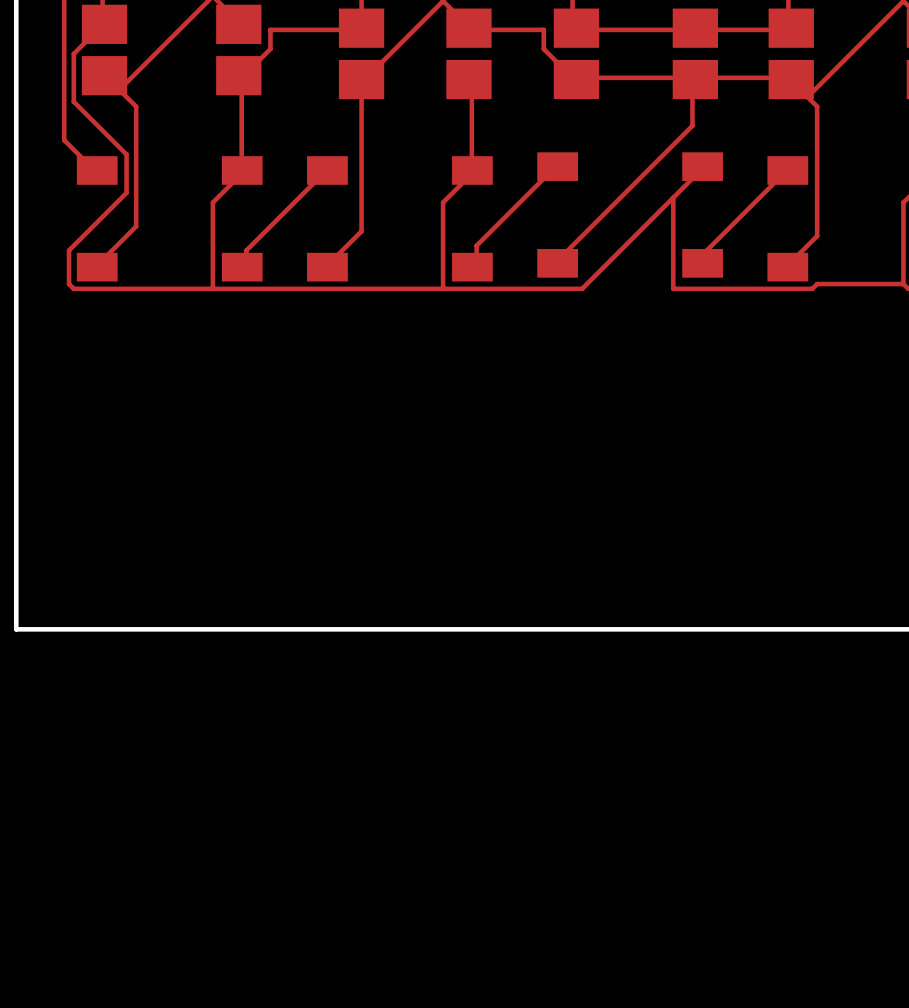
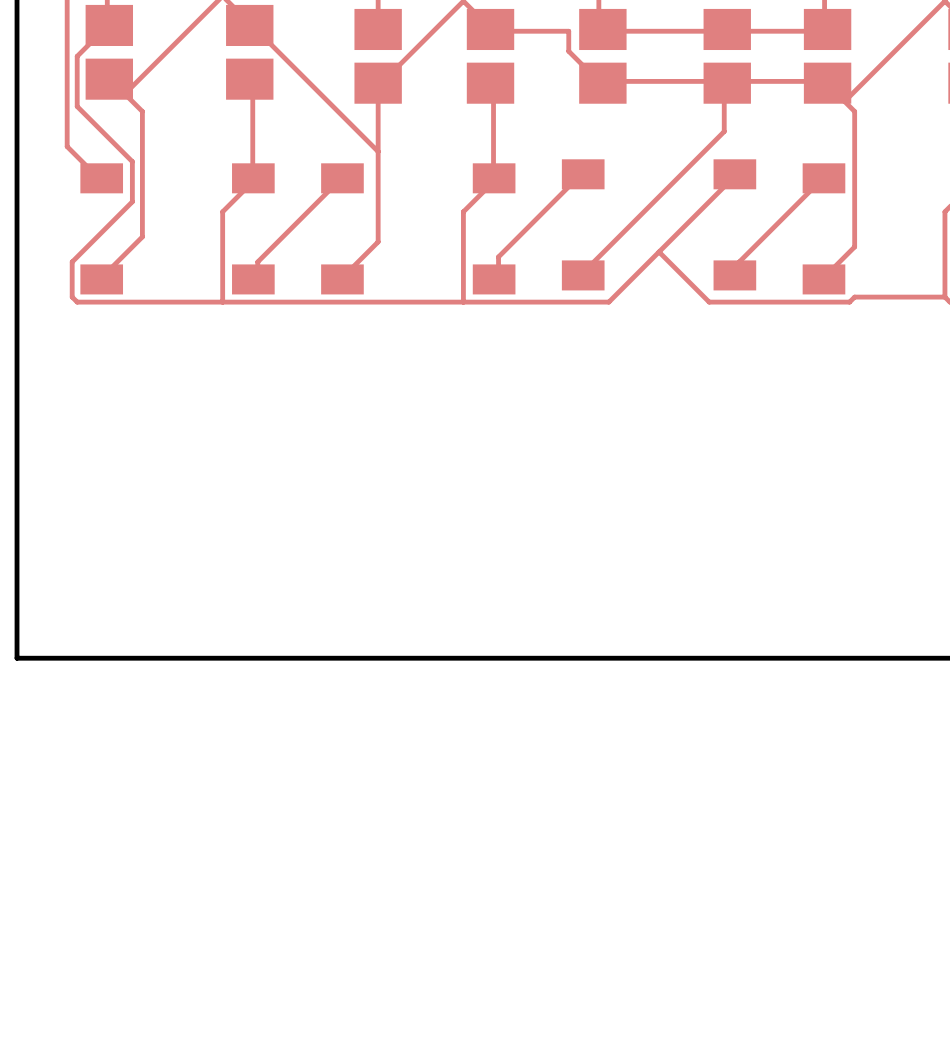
top track: none -> (249, 25) (252, 26) (378, 151)
top track: (361, 28) (361, 29) (270, 29) (270, 49) (241, 77) -> none
top track: (673, 197) (673, 288) (678, 288) -> (659, 251) (709, 302)

